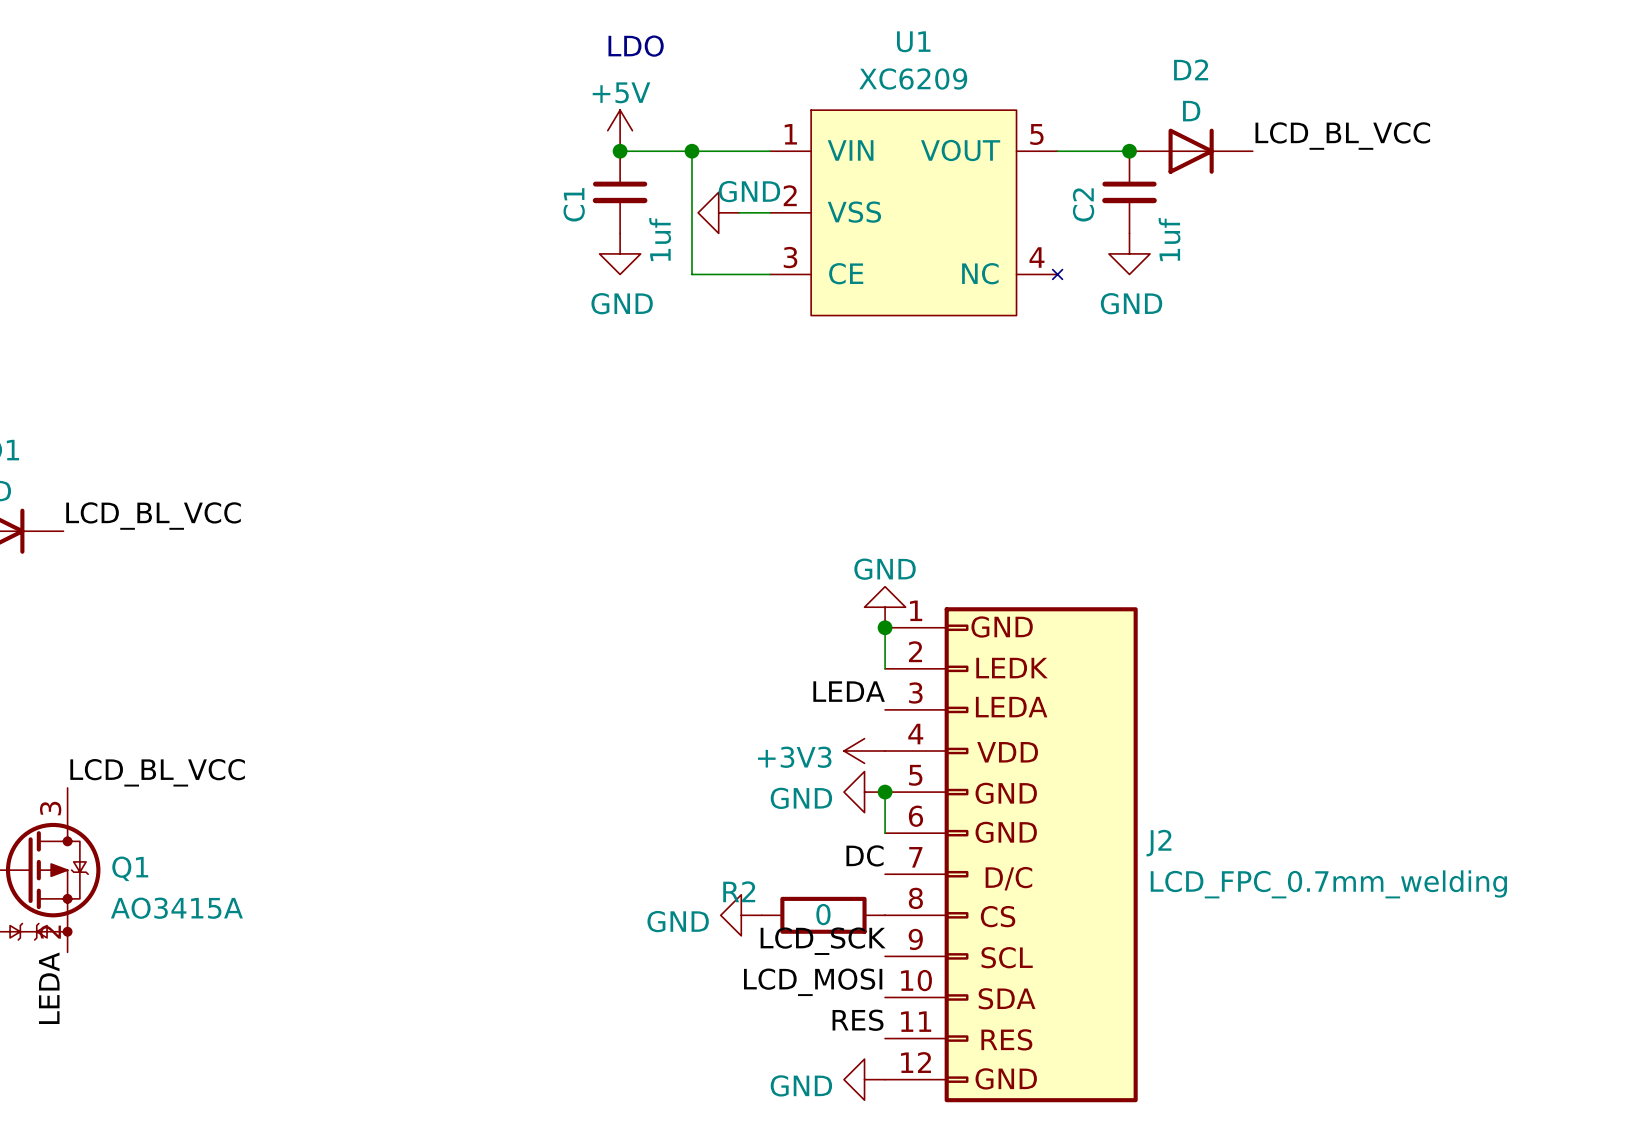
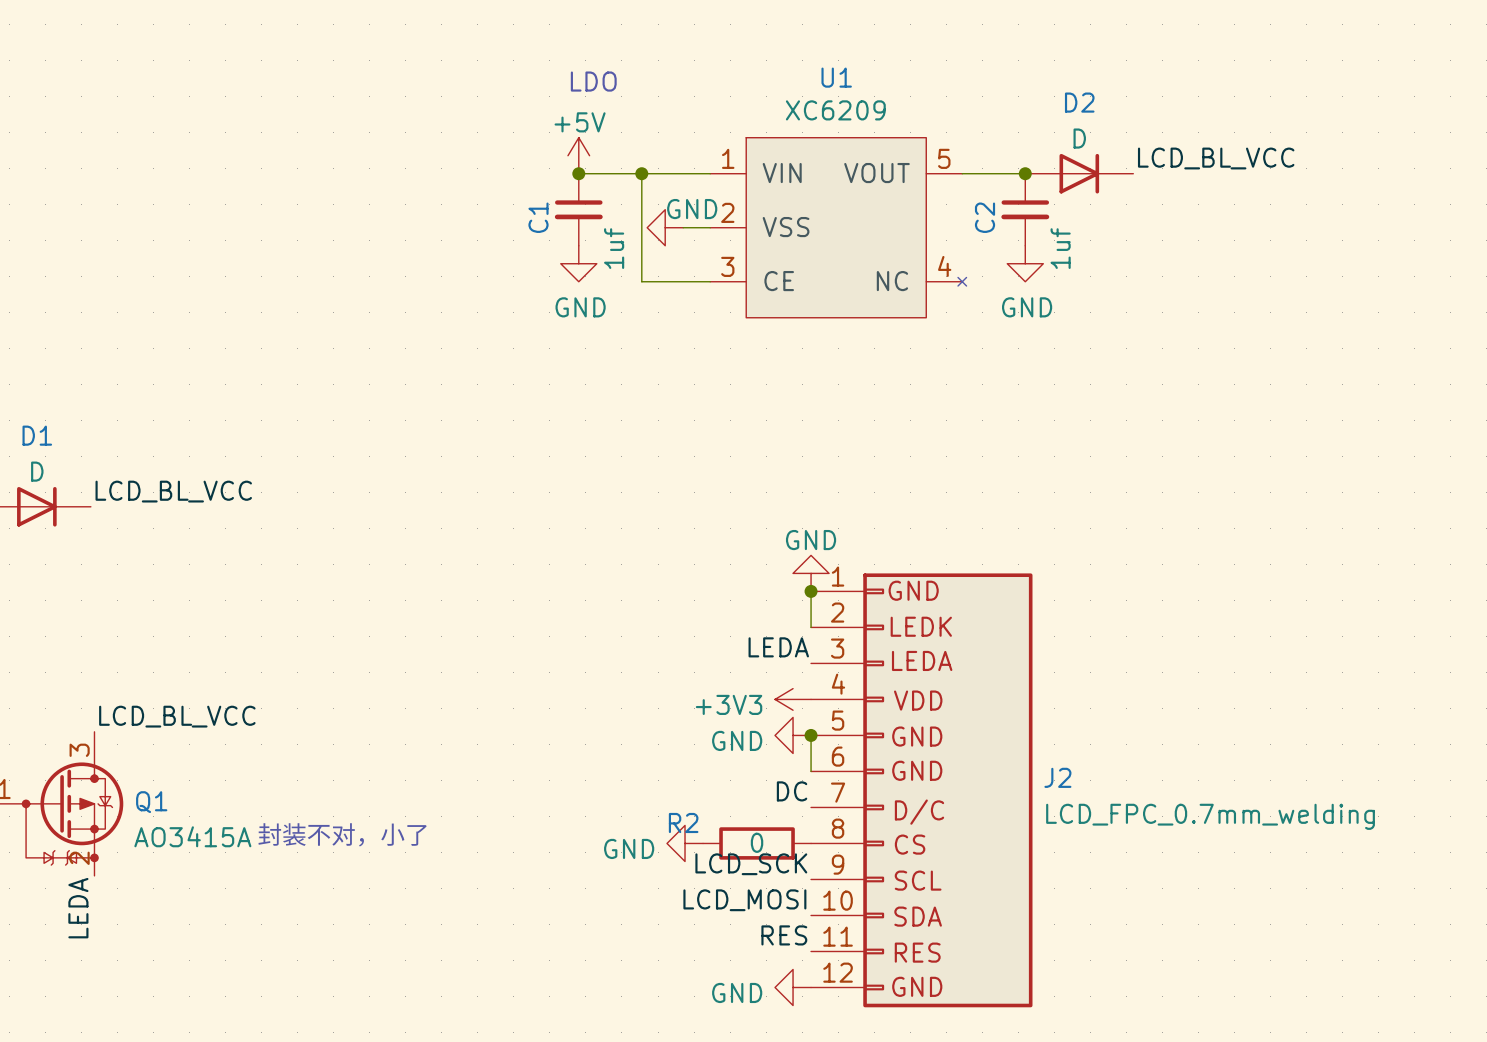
text: none -> 封装不对，小了 (342, 834)

